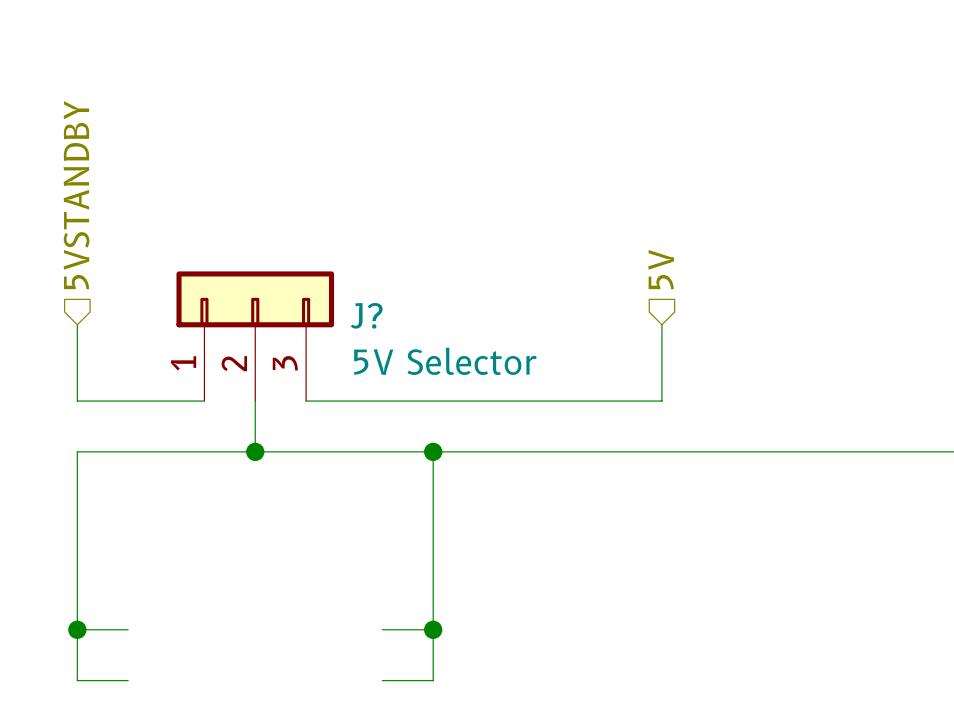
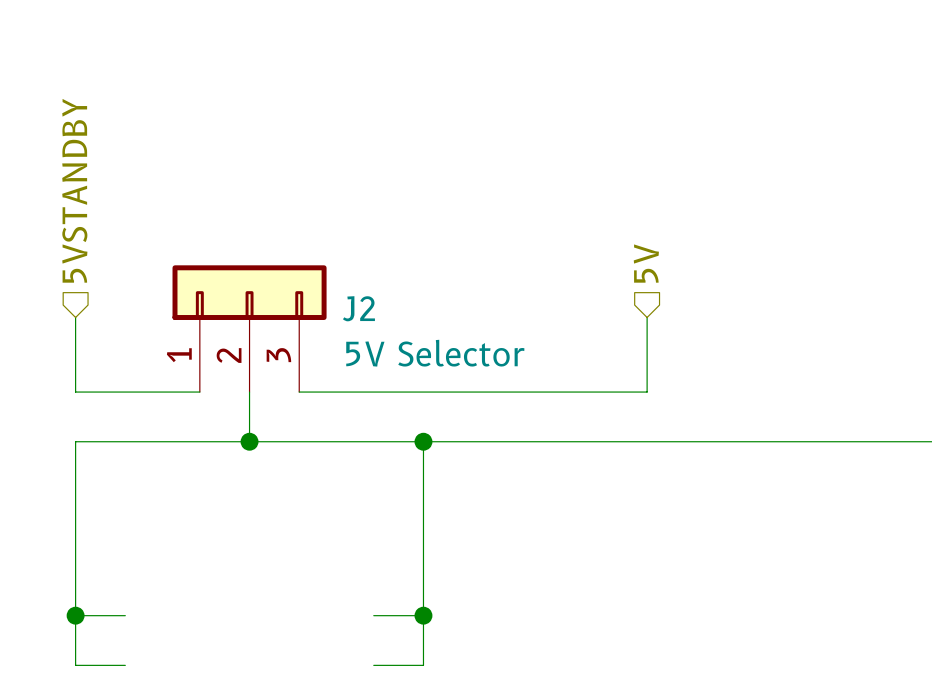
J? name: J? (366, 315) -> J2 (358, 308)

